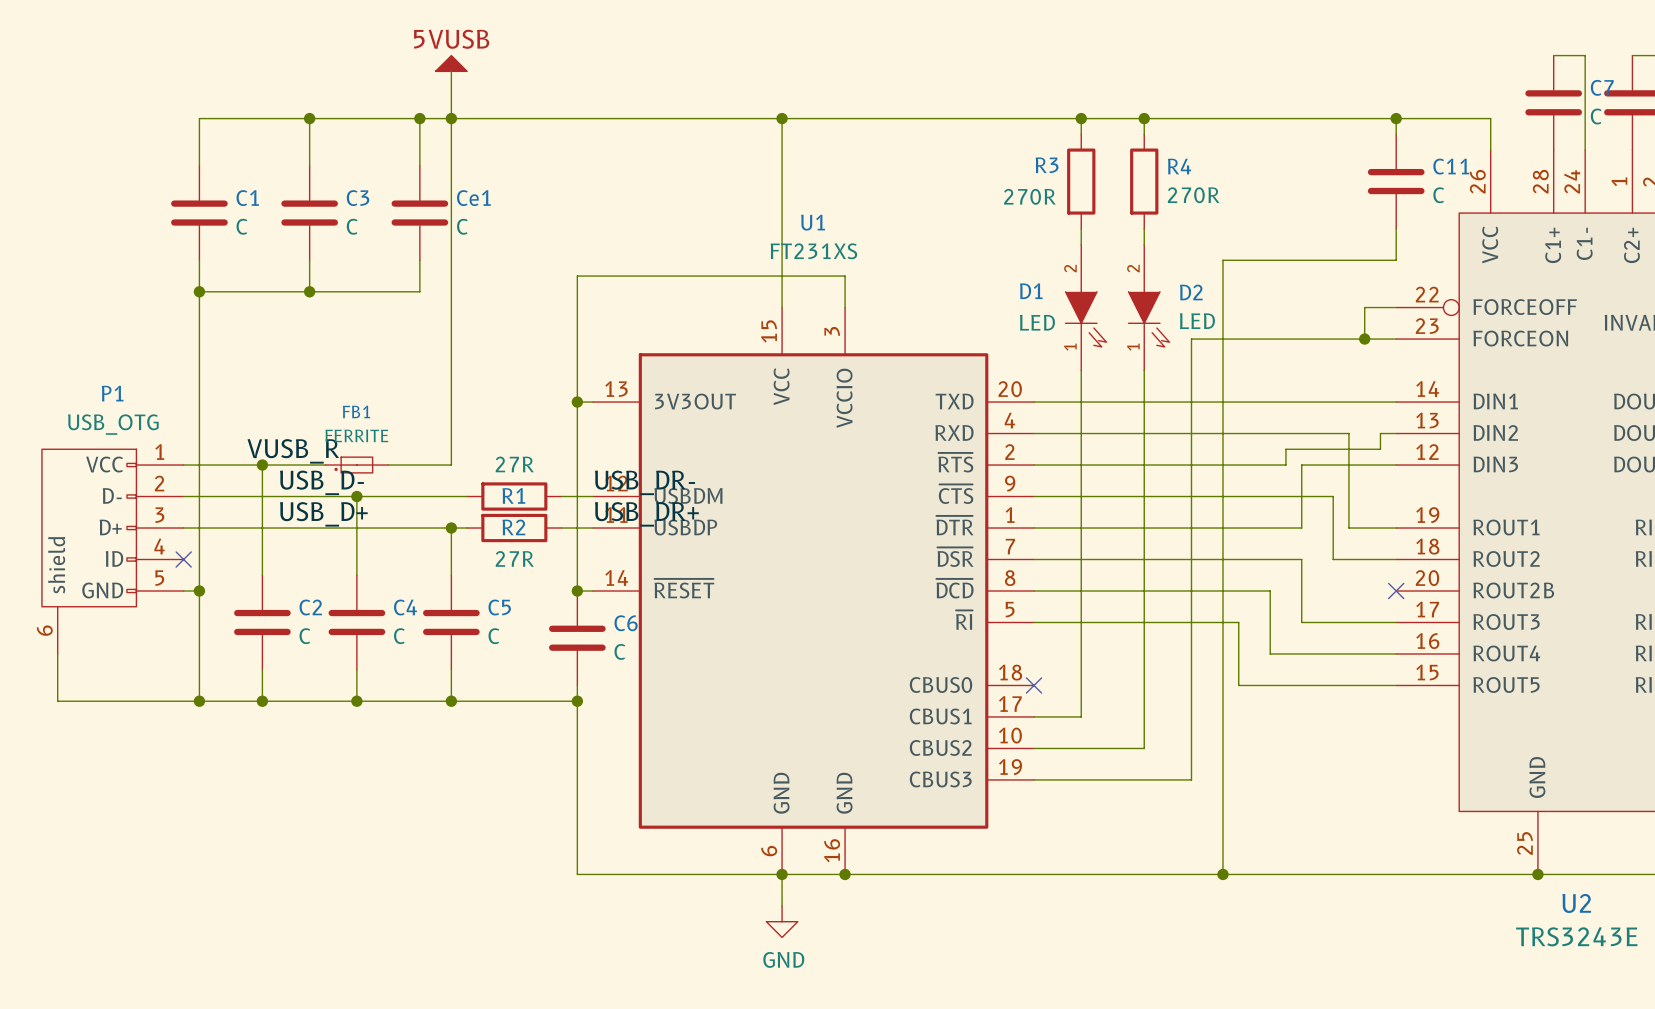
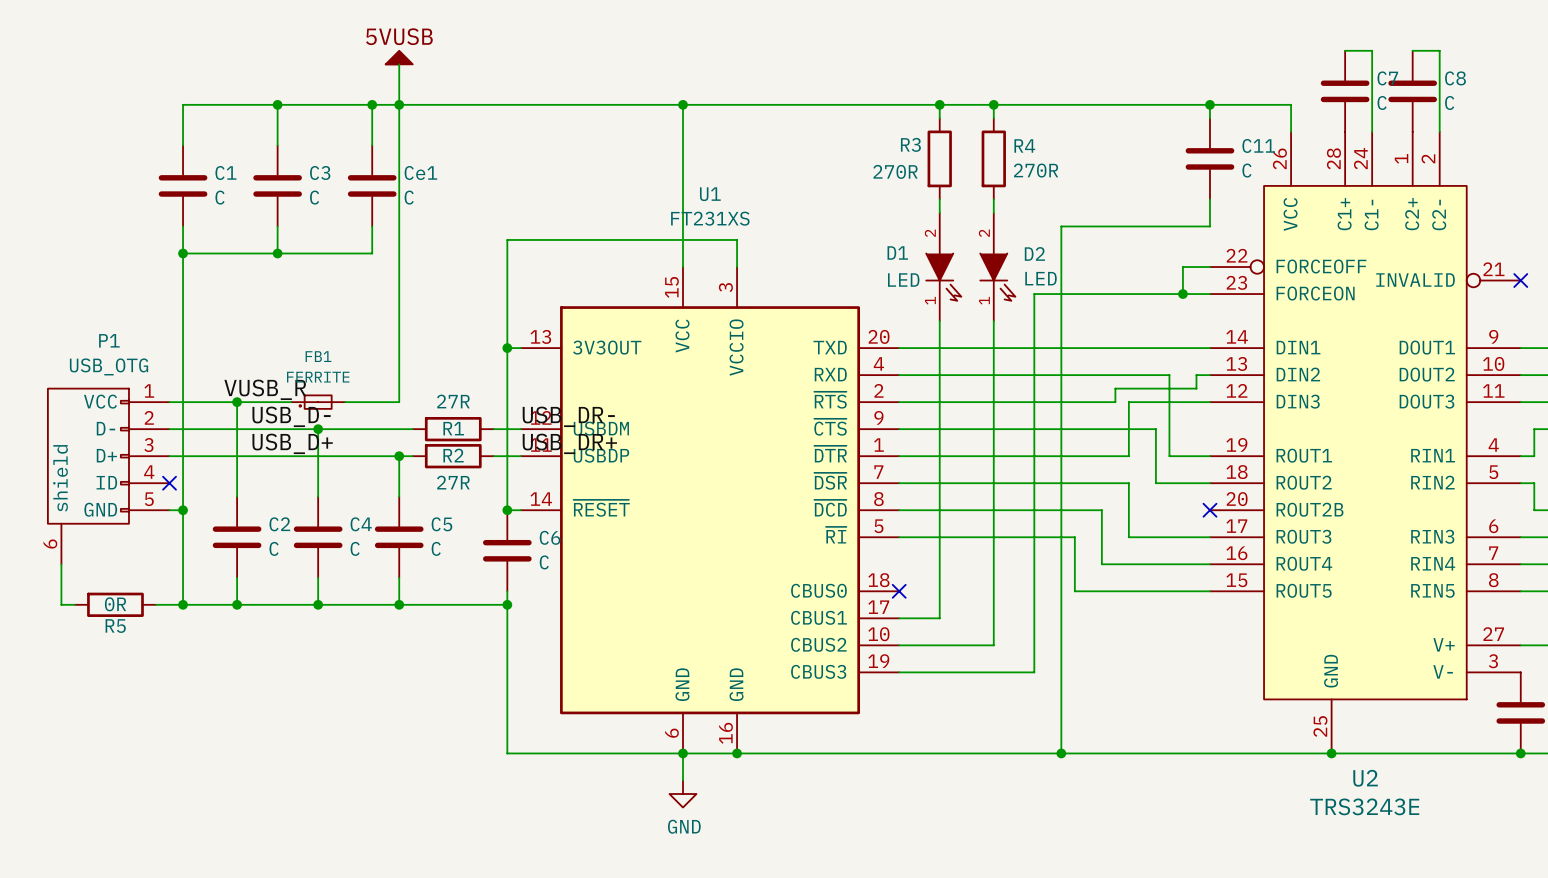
wire: (73, 701) (167, 701) -> none
R5: none -> 0R (115, 604)

